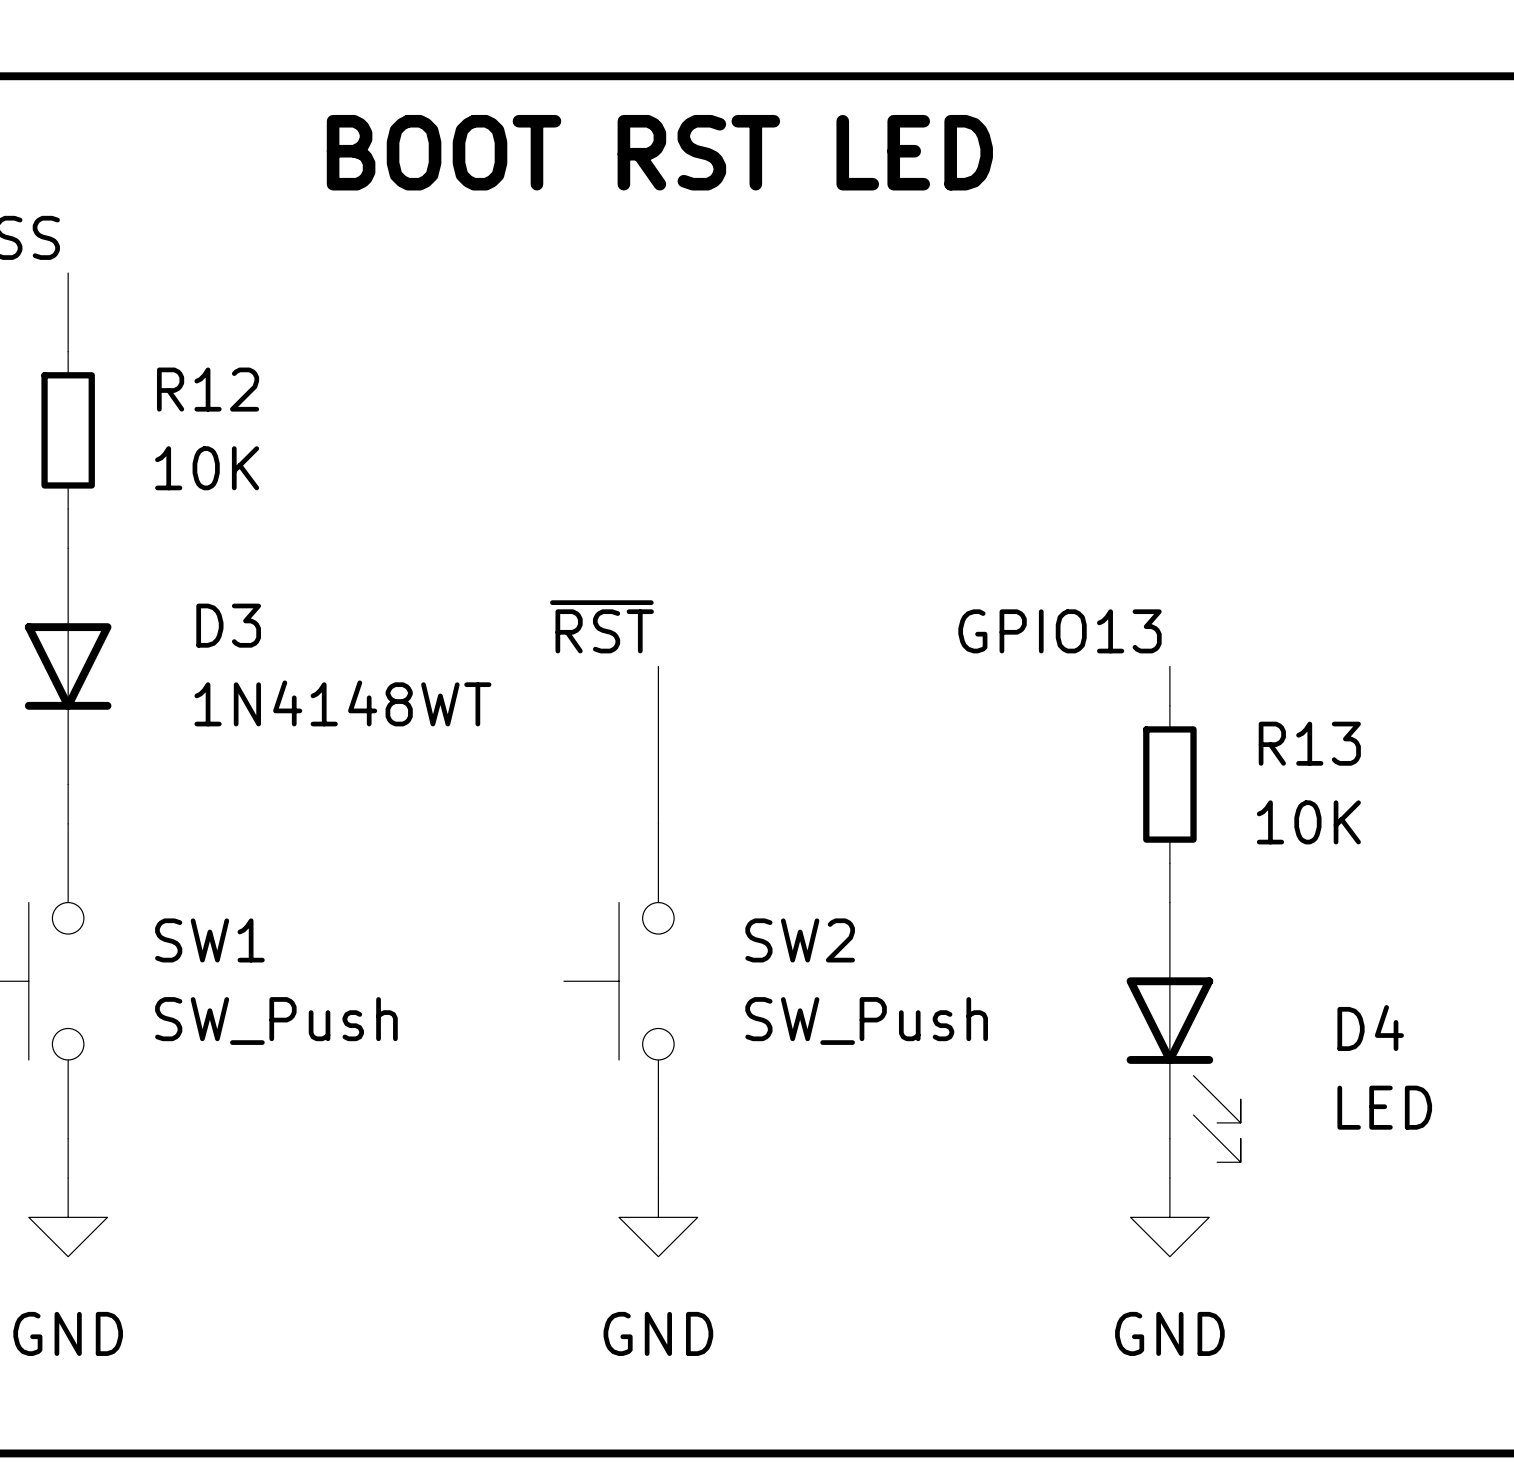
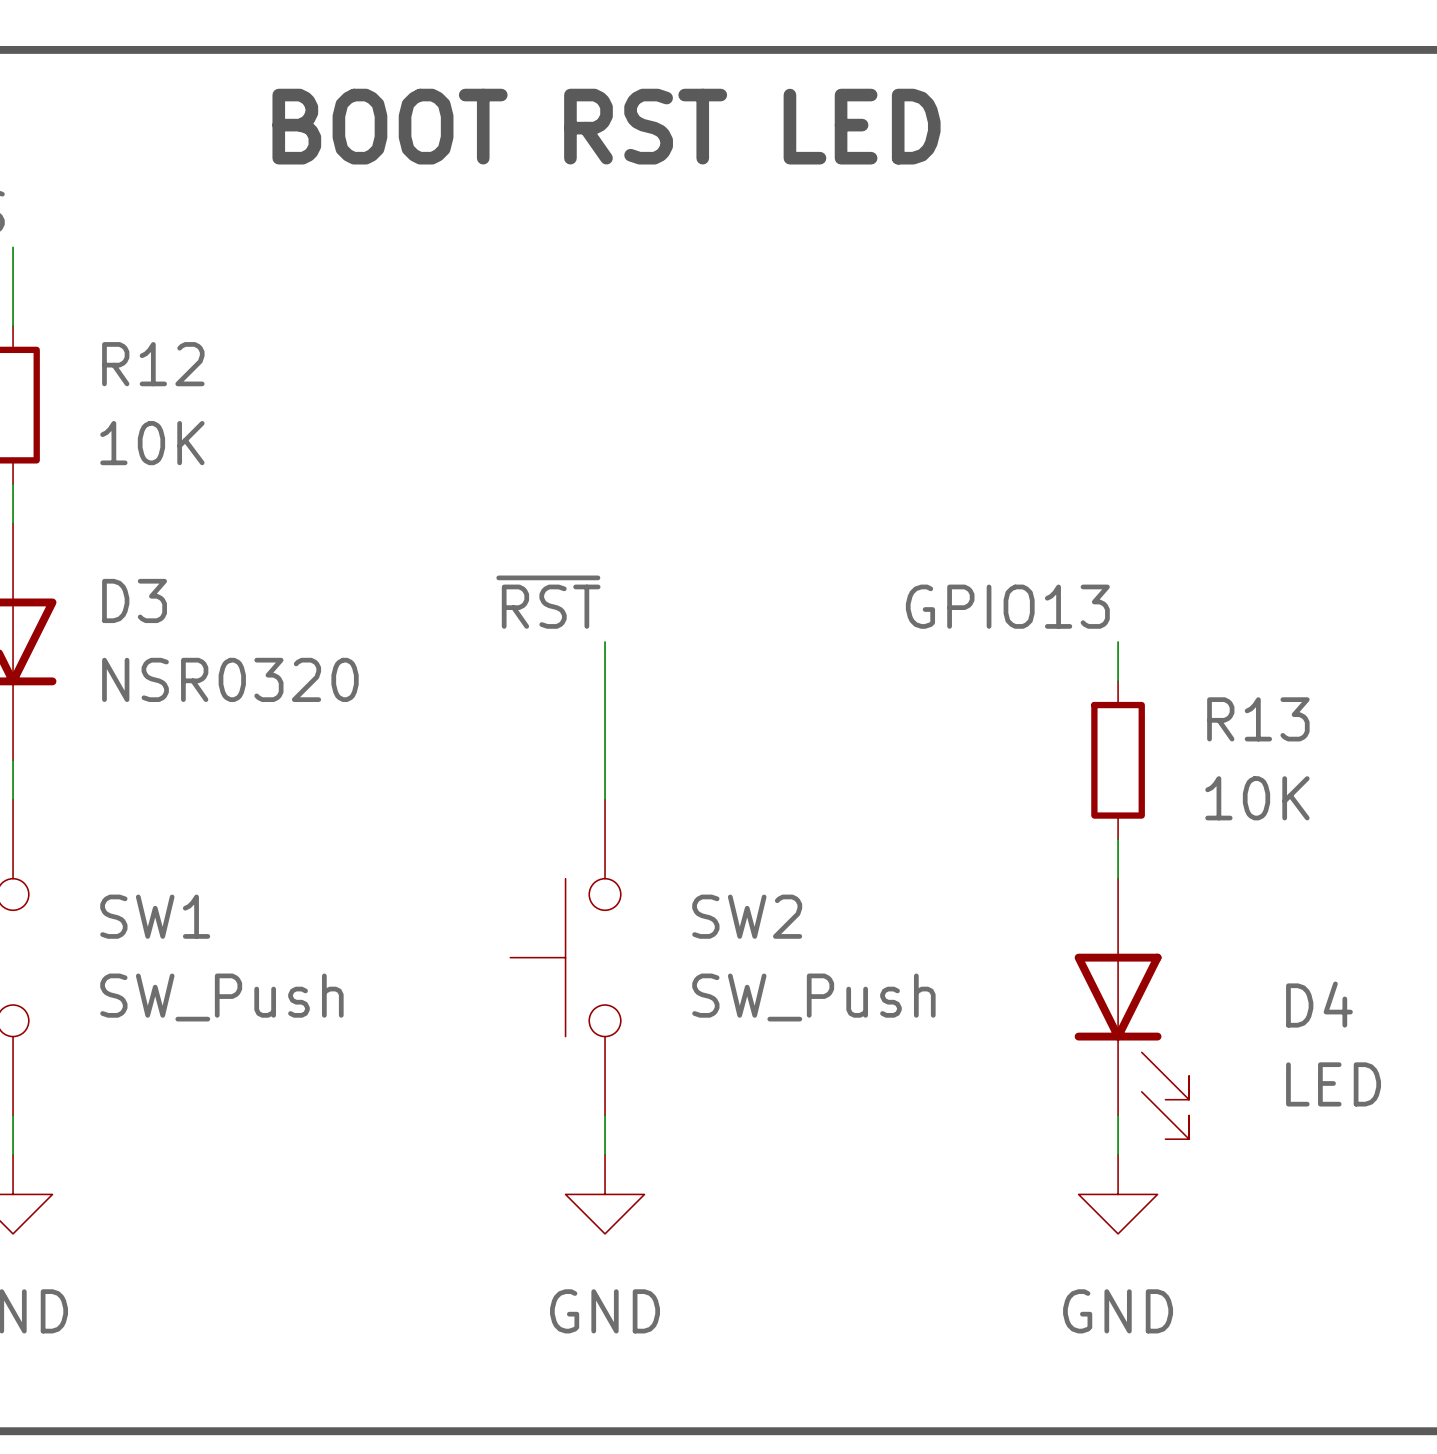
D3 name position: D3 (228, 625) -> D3 (134, 600)
D3 value: 1N4148WT (342, 703) -> NSR0320 (230, 679)

